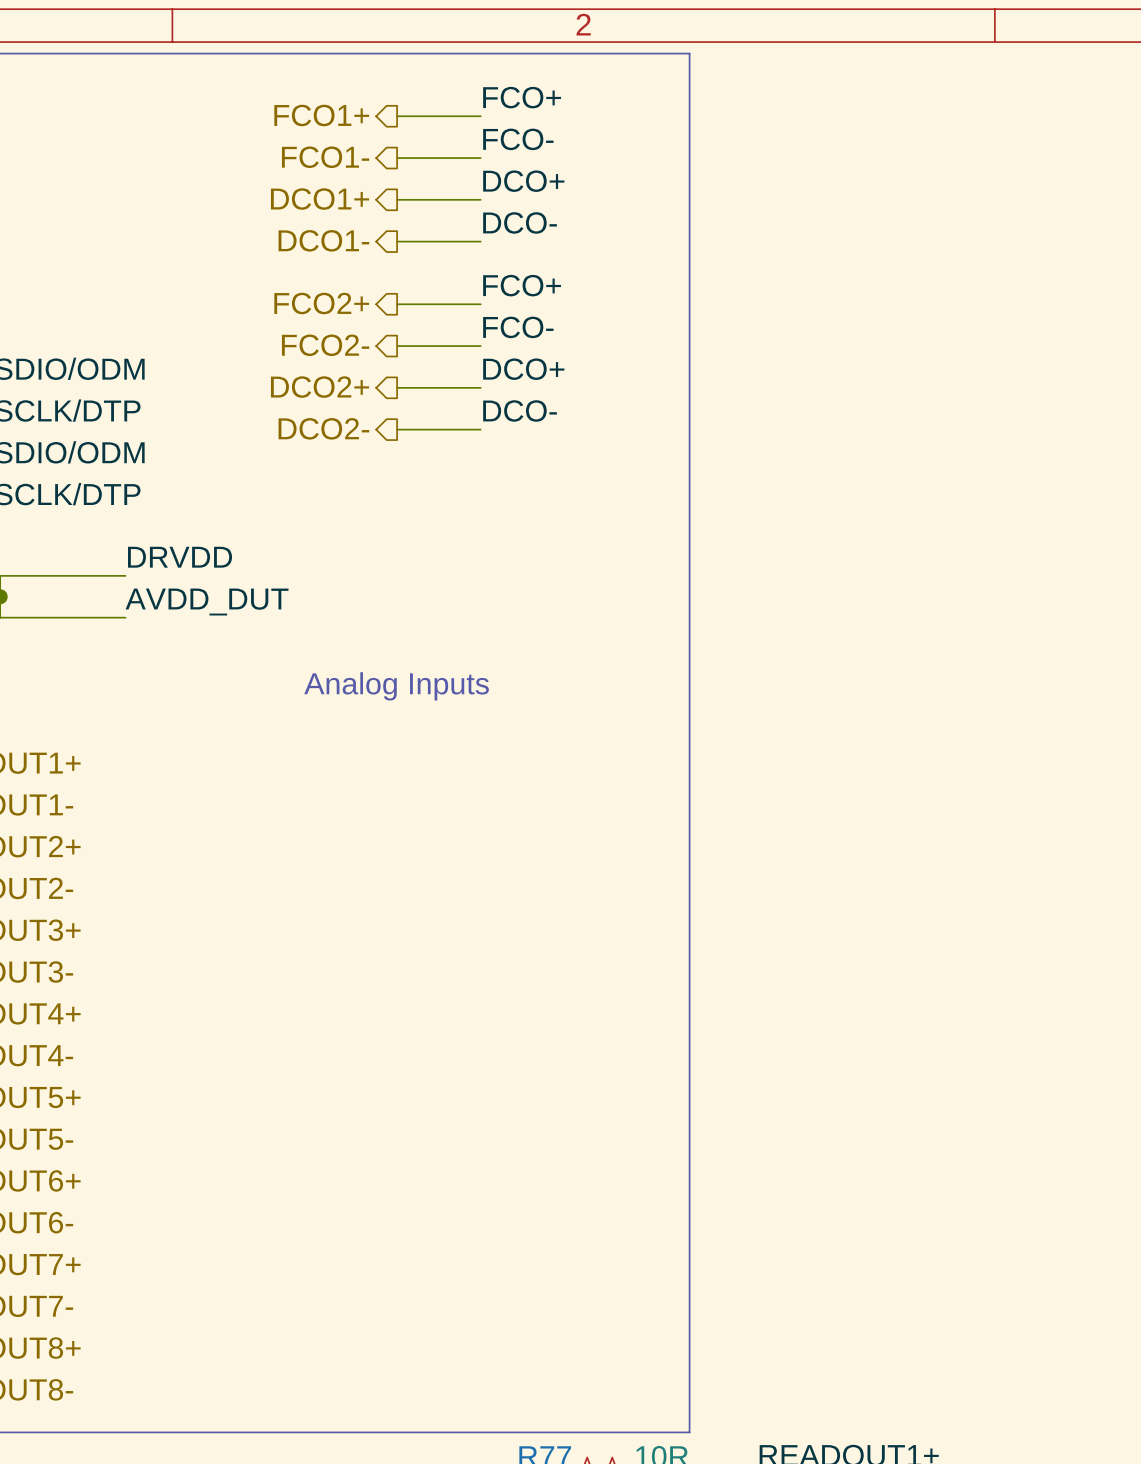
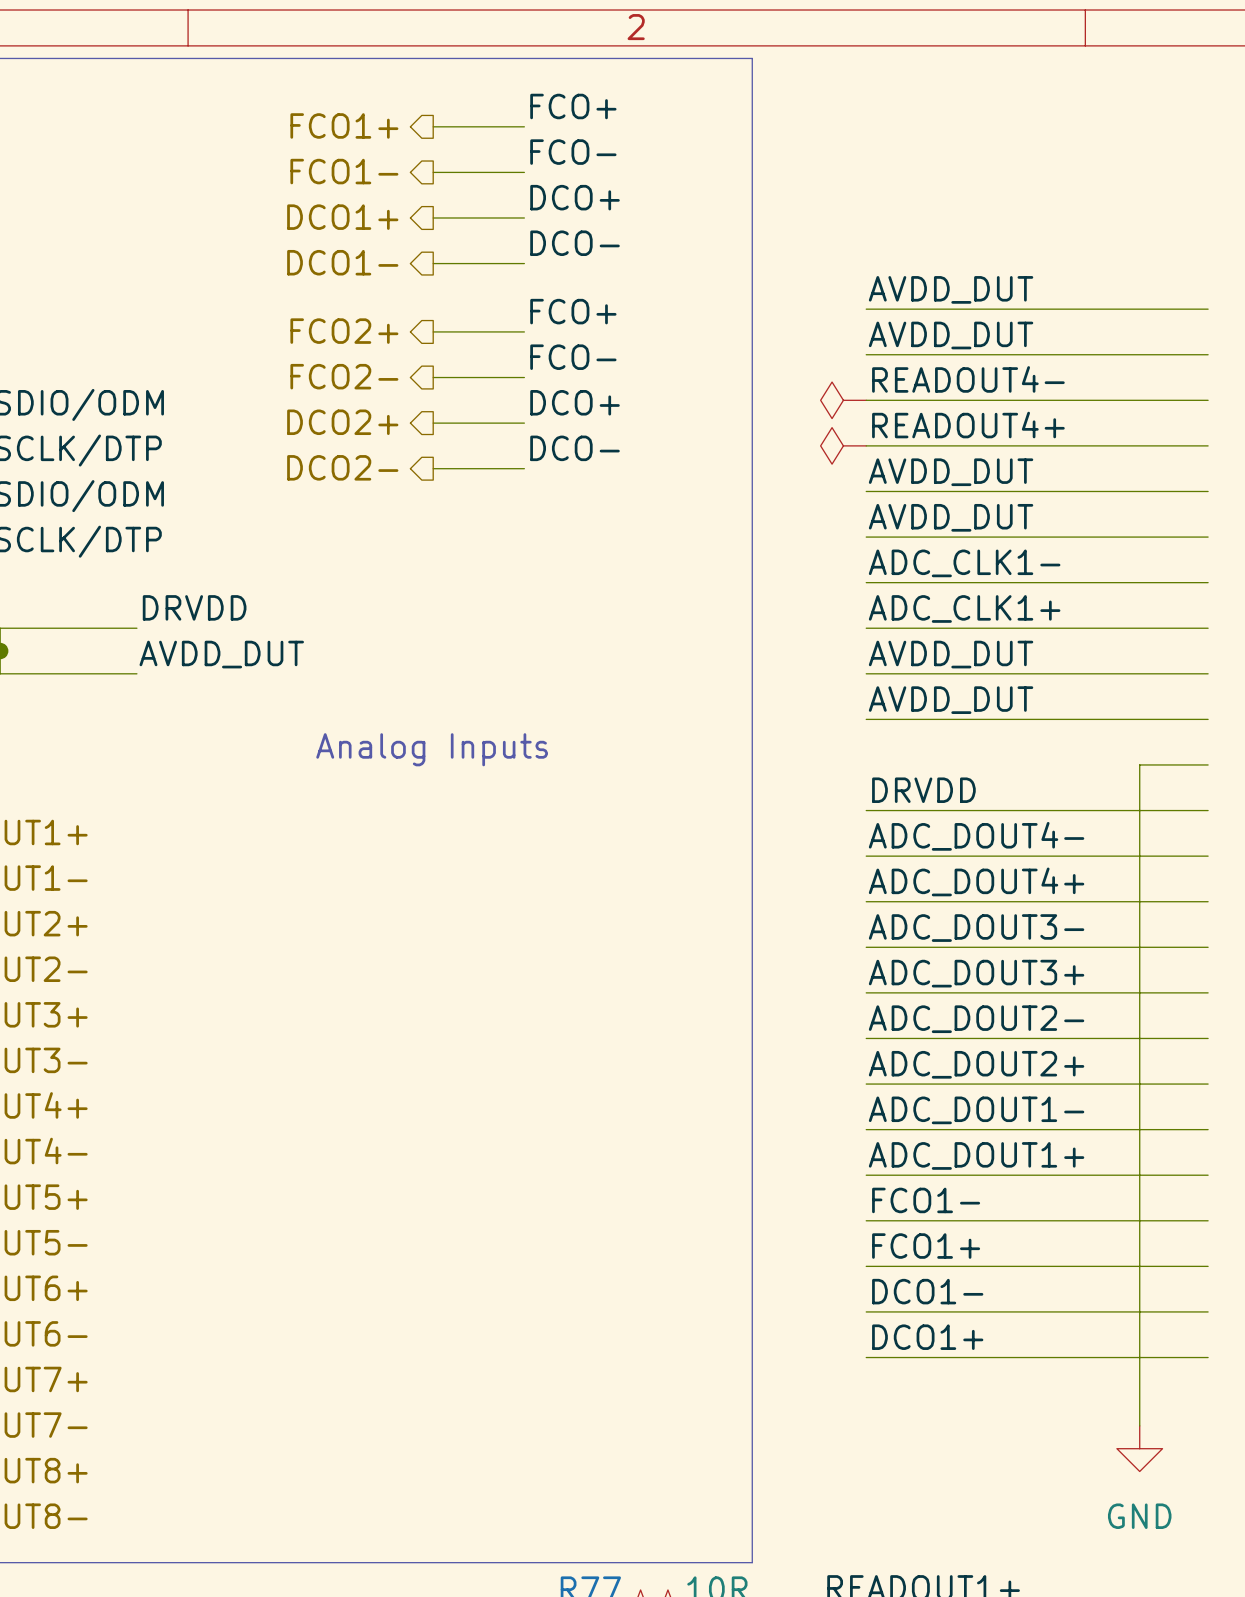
label: none -> AVDD_DUT (951, 289)
wire: none -> (866, 309) (1208, 309)
label: none -> AVDD_DUT (951, 335)
wire: none -> (866, 354) (1208, 354)
label: none -> READOUT4- (968, 379)
power symbol: none -> (843, 400)
wire: none -> (866, 400) (1208, 400)
label: none -> READOUT4+ (968, 425)
power symbol: none -> (843, 445)
wire: none -> (866, 445) (1208, 445)
label: none -> AVDD_DUT (951, 472)
wire: none -> (866, 491) (1208, 491)
label: none -> AVDD_DUT (951, 517)
wire: none -> (866, 537) (1208, 537)
label: none -> ADC_CLK1- (964, 563)
wire: none -> (866, 582) (1208, 582)
label: none -> ADC_CLK1+ (964, 608)
wire: none -> (866, 628) (1208, 628)
label: none -> AVDD_DUT (951, 654)
wire: none -> (866, 673) (1208, 673)
label: none -> AVDD_DUT (951, 700)
wire: none -> (866, 719) (1208, 719)
wire: none -> (1208, 764) (1139, 764) (1139, 1425)
label: none -> DRVDD (923, 790)
wire: none -> (866, 810) (1208, 810)
label: none -> ADC_DOUT4- (976, 836)
wire: none -> (866, 856) (1208, 856)
label: none -> ADC_DOUT4+ (976, 881)
wire: none -> (866, 901) (1208, 901)
label: none -> ADC_DOUT3- (976, 928)
wire: none -> (866, 947) (1208, 947)
label: none -> ADC_DOUT3+ (976, 973)
wire: none -> (866, 992) (1208, 992)
label: none -> ADC_DOUT2- (976, 1019)
wire: none -> (866, 1038) (1208, 1038)
label: none -> ADC_DOUT2+ (976, 1064)
wire: none -> (866, 1084) (1208, 1084)
label: none -> ADC_DOUT1- (976, 1110)
wire: none -> (866, 1129) (1208, 1129)
label: none -> ADC_DOUT1+ (976, 1155)
wire: none -> (866, 1175) (1208, 1175)
label: none -> FCO1- (926, 1200)
wire: none -> (866, 1220) (1208, 1220)
label: none -> FCO1+ (926, 1246)
wire: none -> (866, 1266) (1208, 1266)
label: none -> DCO1- (927, 1291)
wire: none -> (866, 1311) (1208, 1311)
label: none -> DCO1+ (927, 1337)
wire: none -> (866, 1357) (1208, 1357)
power symbol: none -> GND (1139, 1448)

